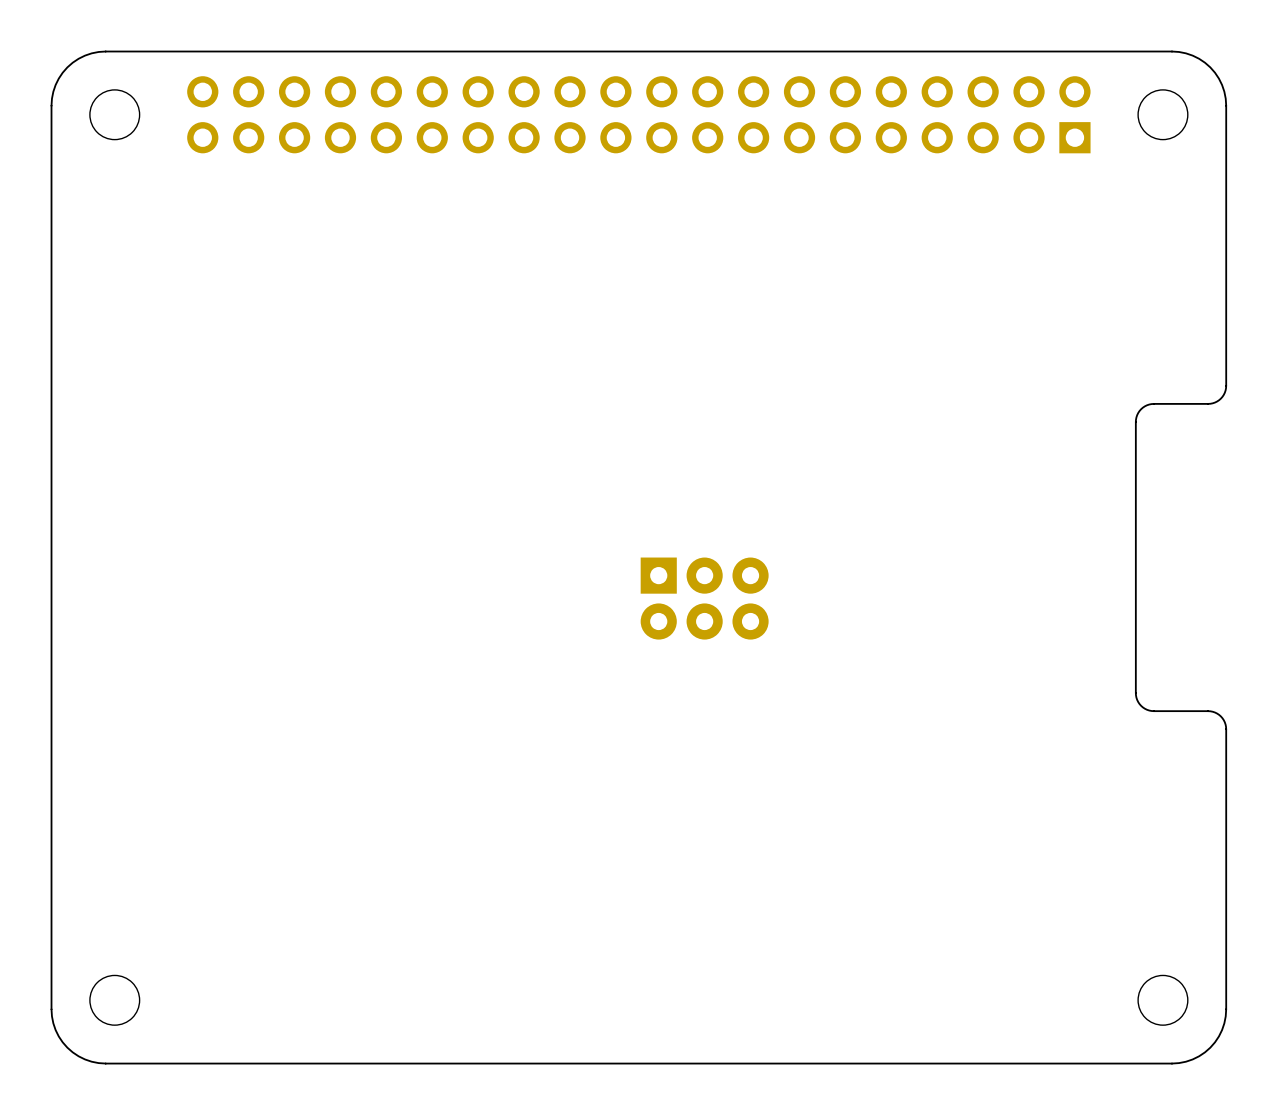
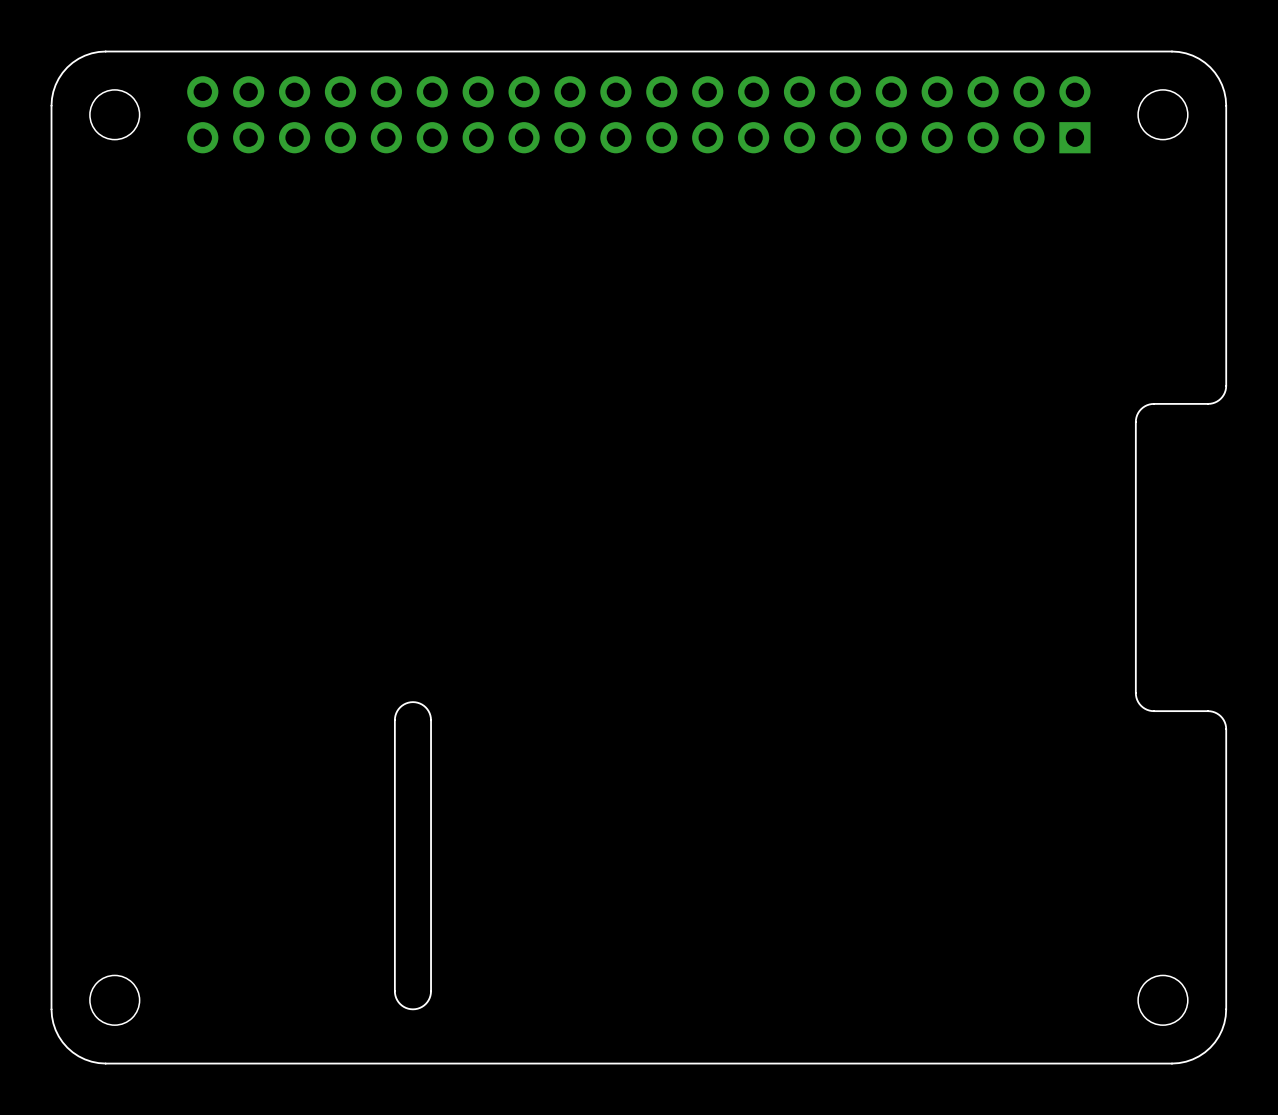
part: (704, 598) -> none
board edge: none -> (431, 720) (430, 993) (423, 1005) (410, 1009) (398, 1002) (394, 991) (395, 717) (401, 705) (412, 702) (425, 707) (431, 720)

